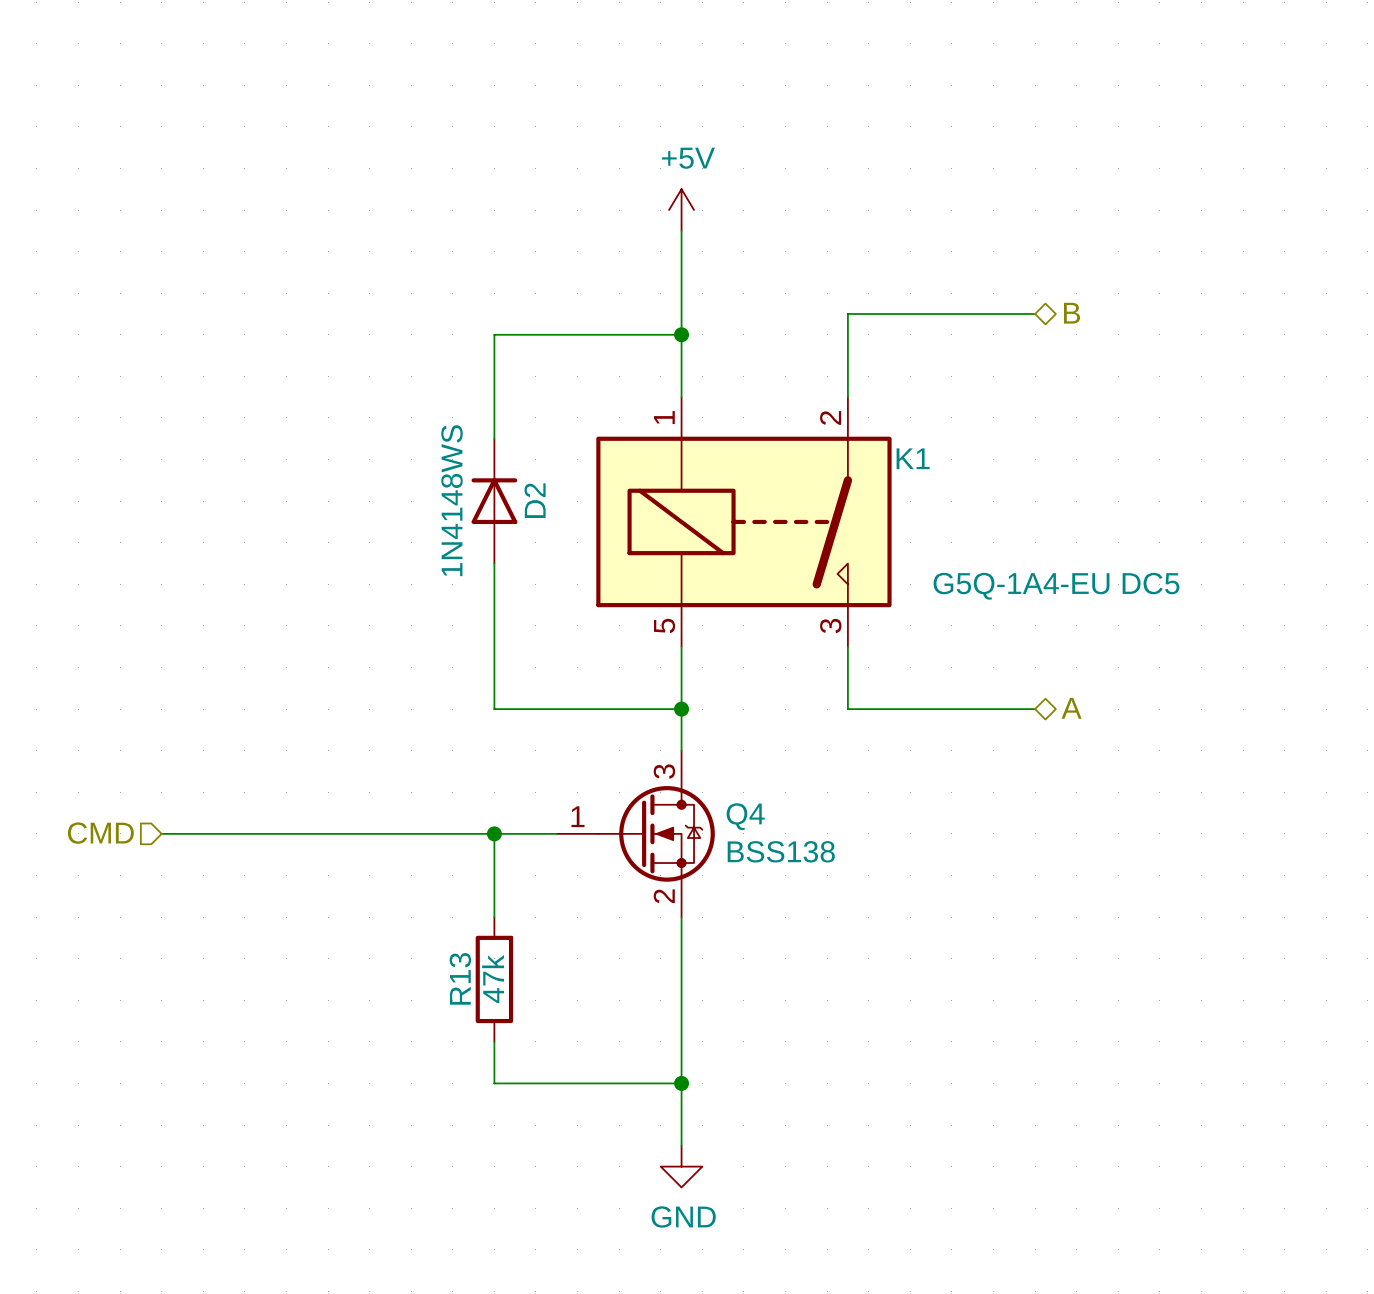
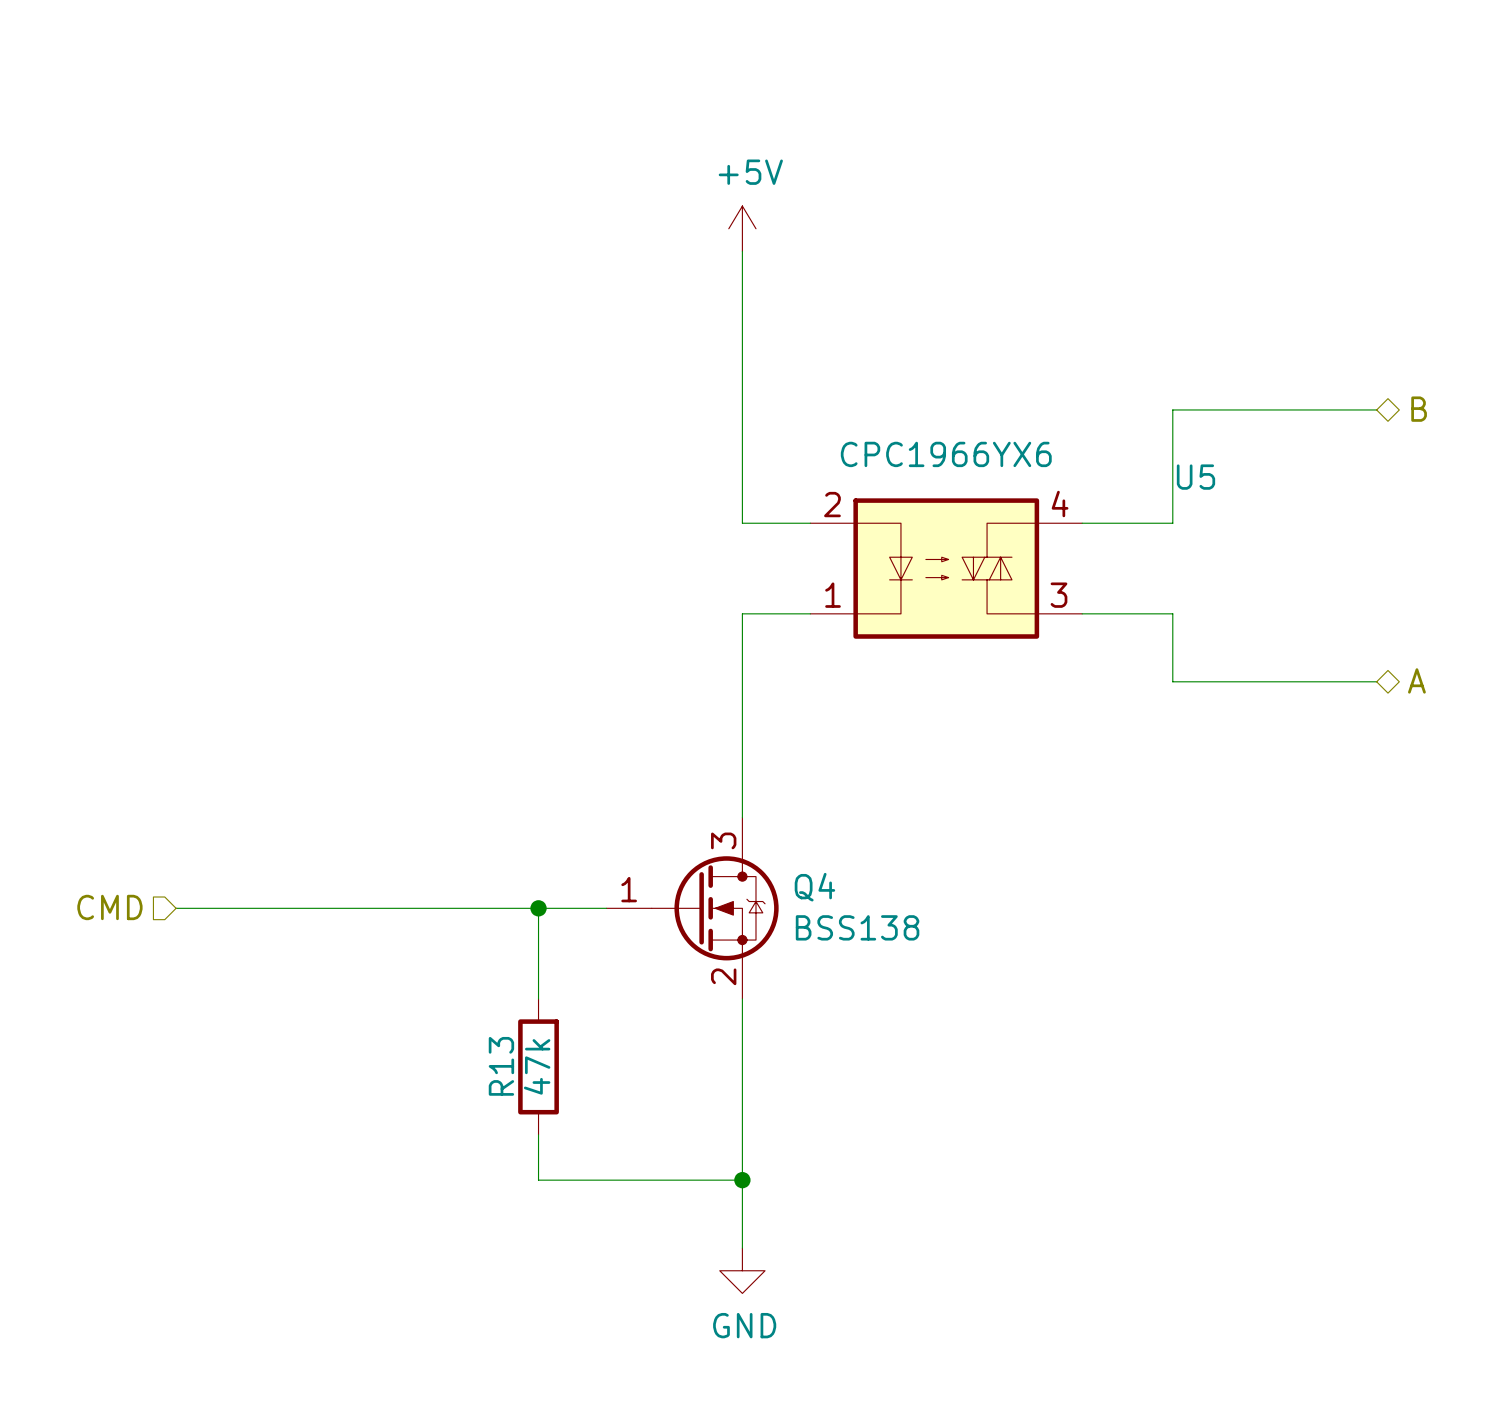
wire: (1035, 313) (847, 313) (847, 397) -> none
hierarchical label position: B (1072, 313) -> B (1419, 409)
wire: (681, 334) (494, 334) (494, 438) -> none
junction: (681, 334) -> none
wire: none -> (1376, 409) (1172, 409) (1172, 523) (1082, 523)
D2: 1N4148WS (494, 501) -> none
K1: G5Q-1A4-EU DC5 (743, 521) -> none
U5: none -> CPC1966YX6 (946, 568)
wire: (494, 563) (494, 709) (681, 709) -> none
wire: none -> (1082, 613) (1172, 613) (1172, 681) (1376, 681)
wire: (847, 646) (847, 709) (1035, 709) -> none
hierarchical label position: A (1071, 708) -> A (1416, 680)
junction: (681, 709) -> none

